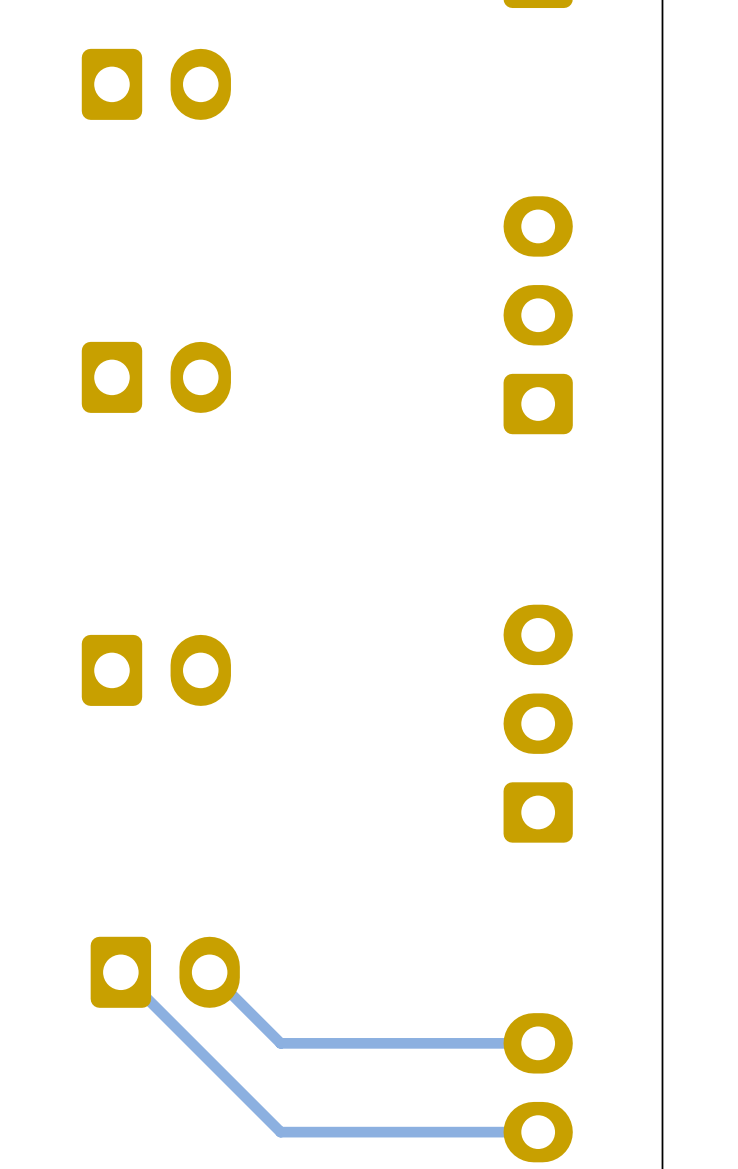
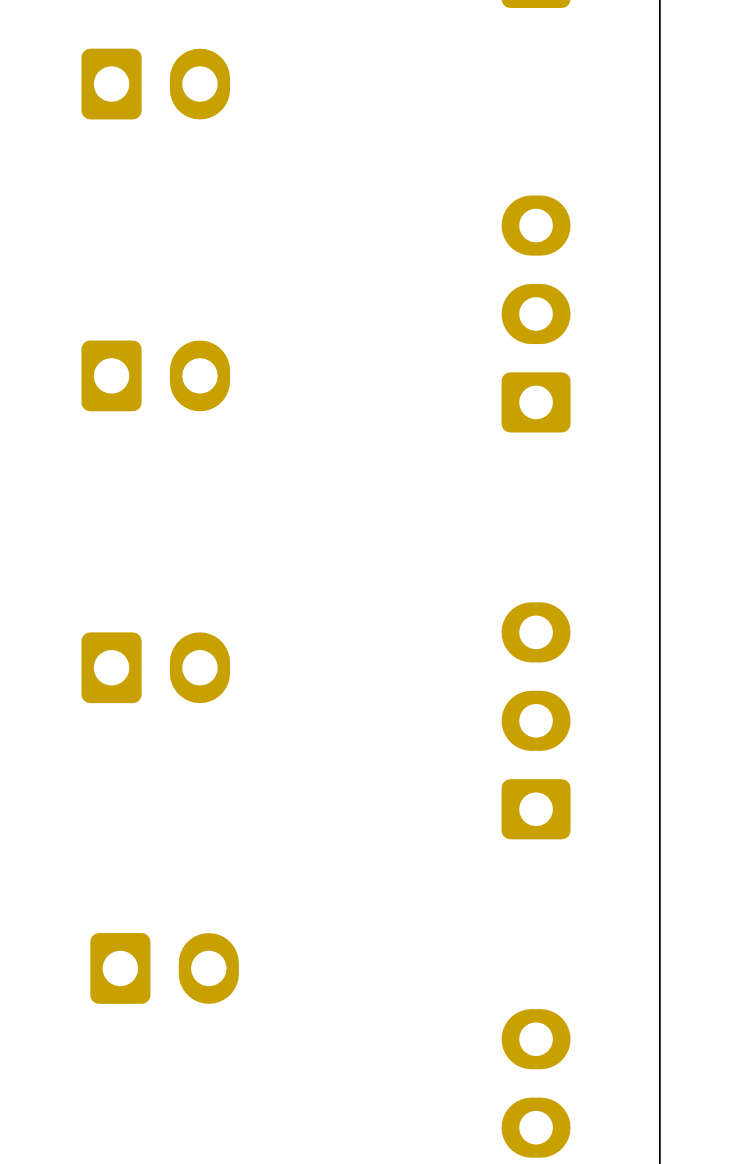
track: (120, 972) (280, 1132) (538, 1132) -> none
track: (209, 972) (280, 1043) (538, 1043) -> none

